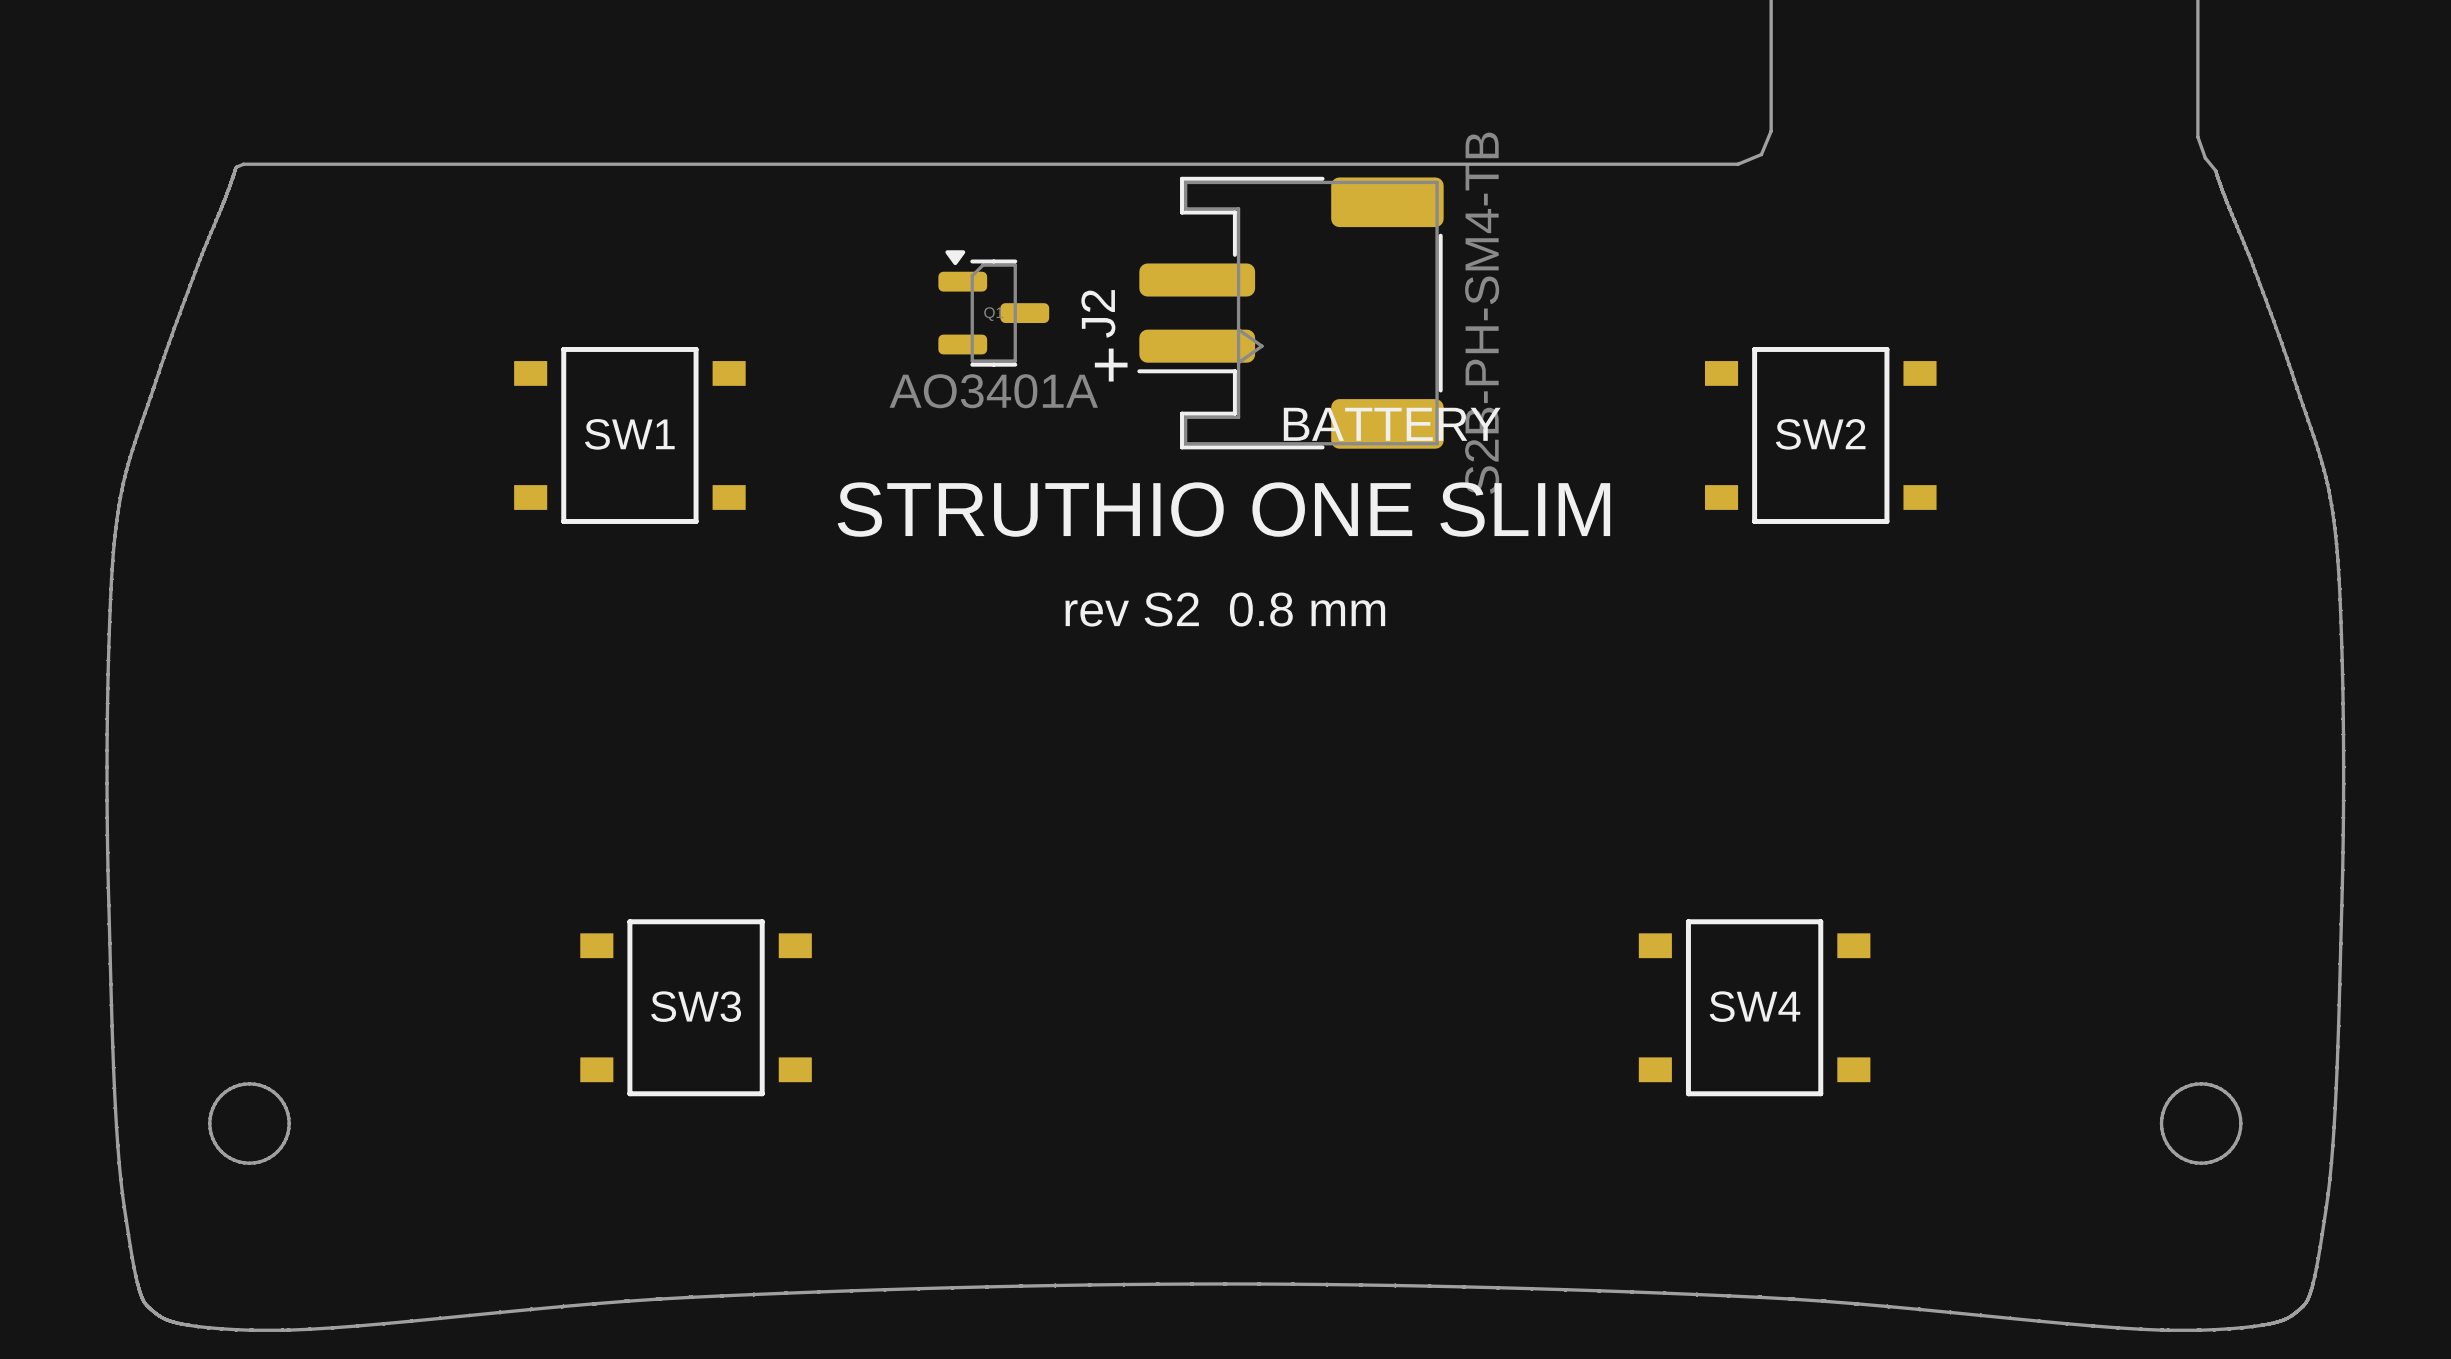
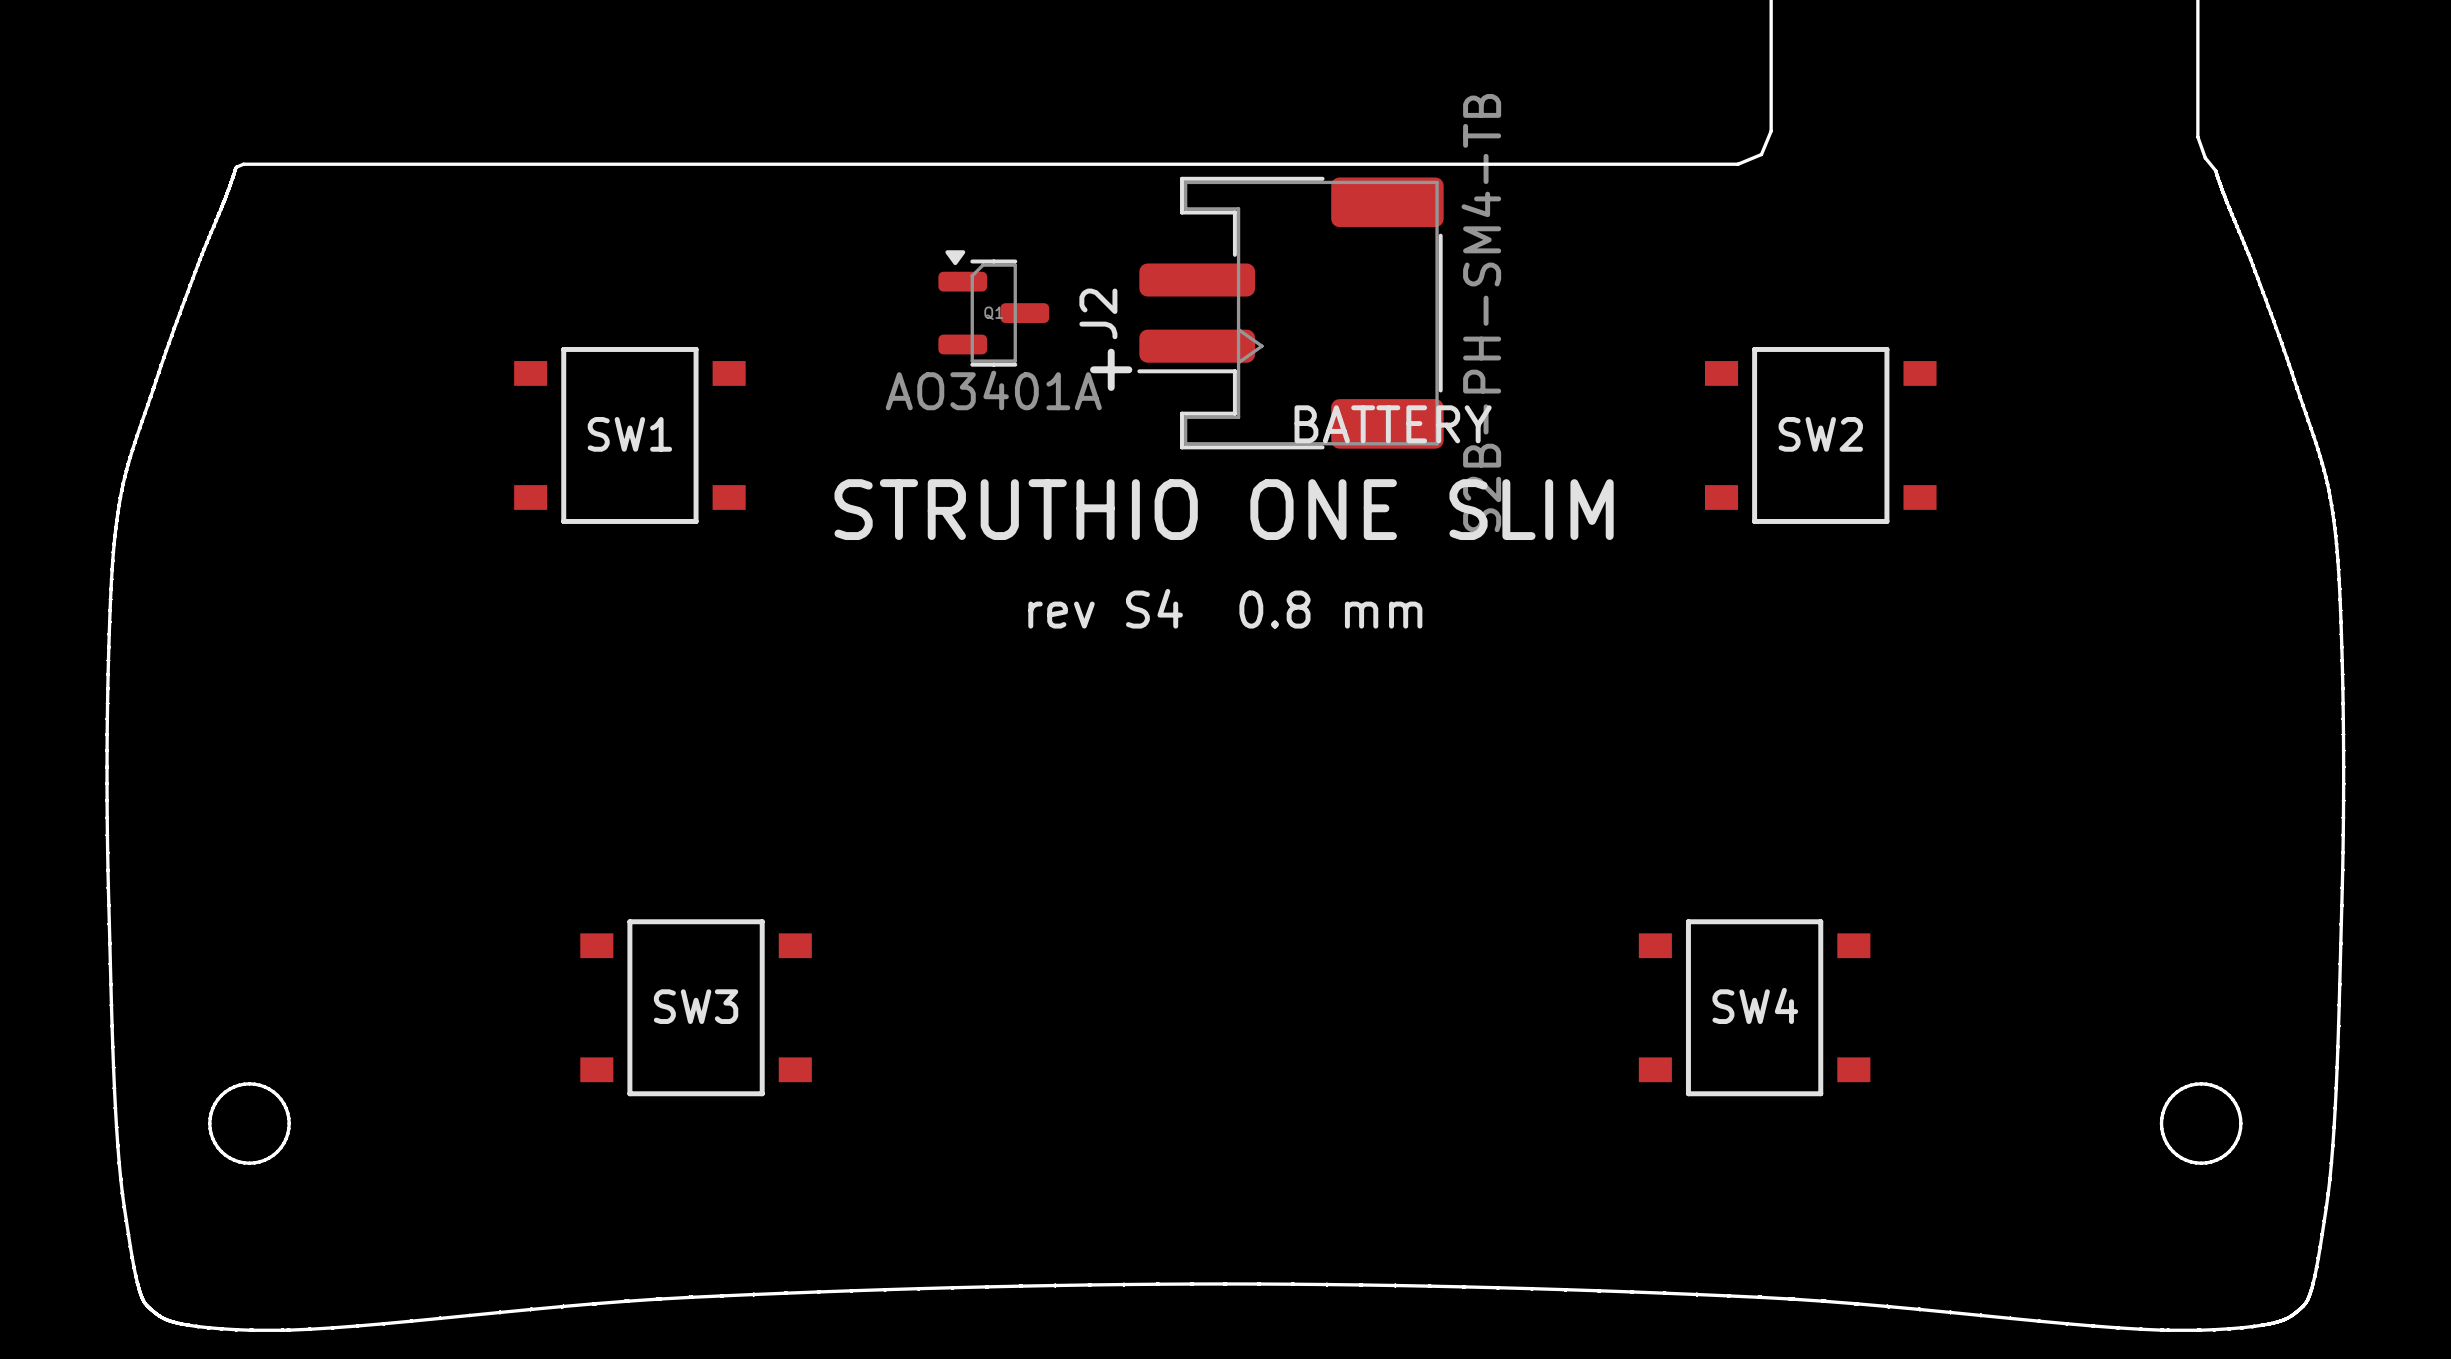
text: rev S2 0.8 mm (1225, 609) -> rev S4 0.8 mm (1225, 608)

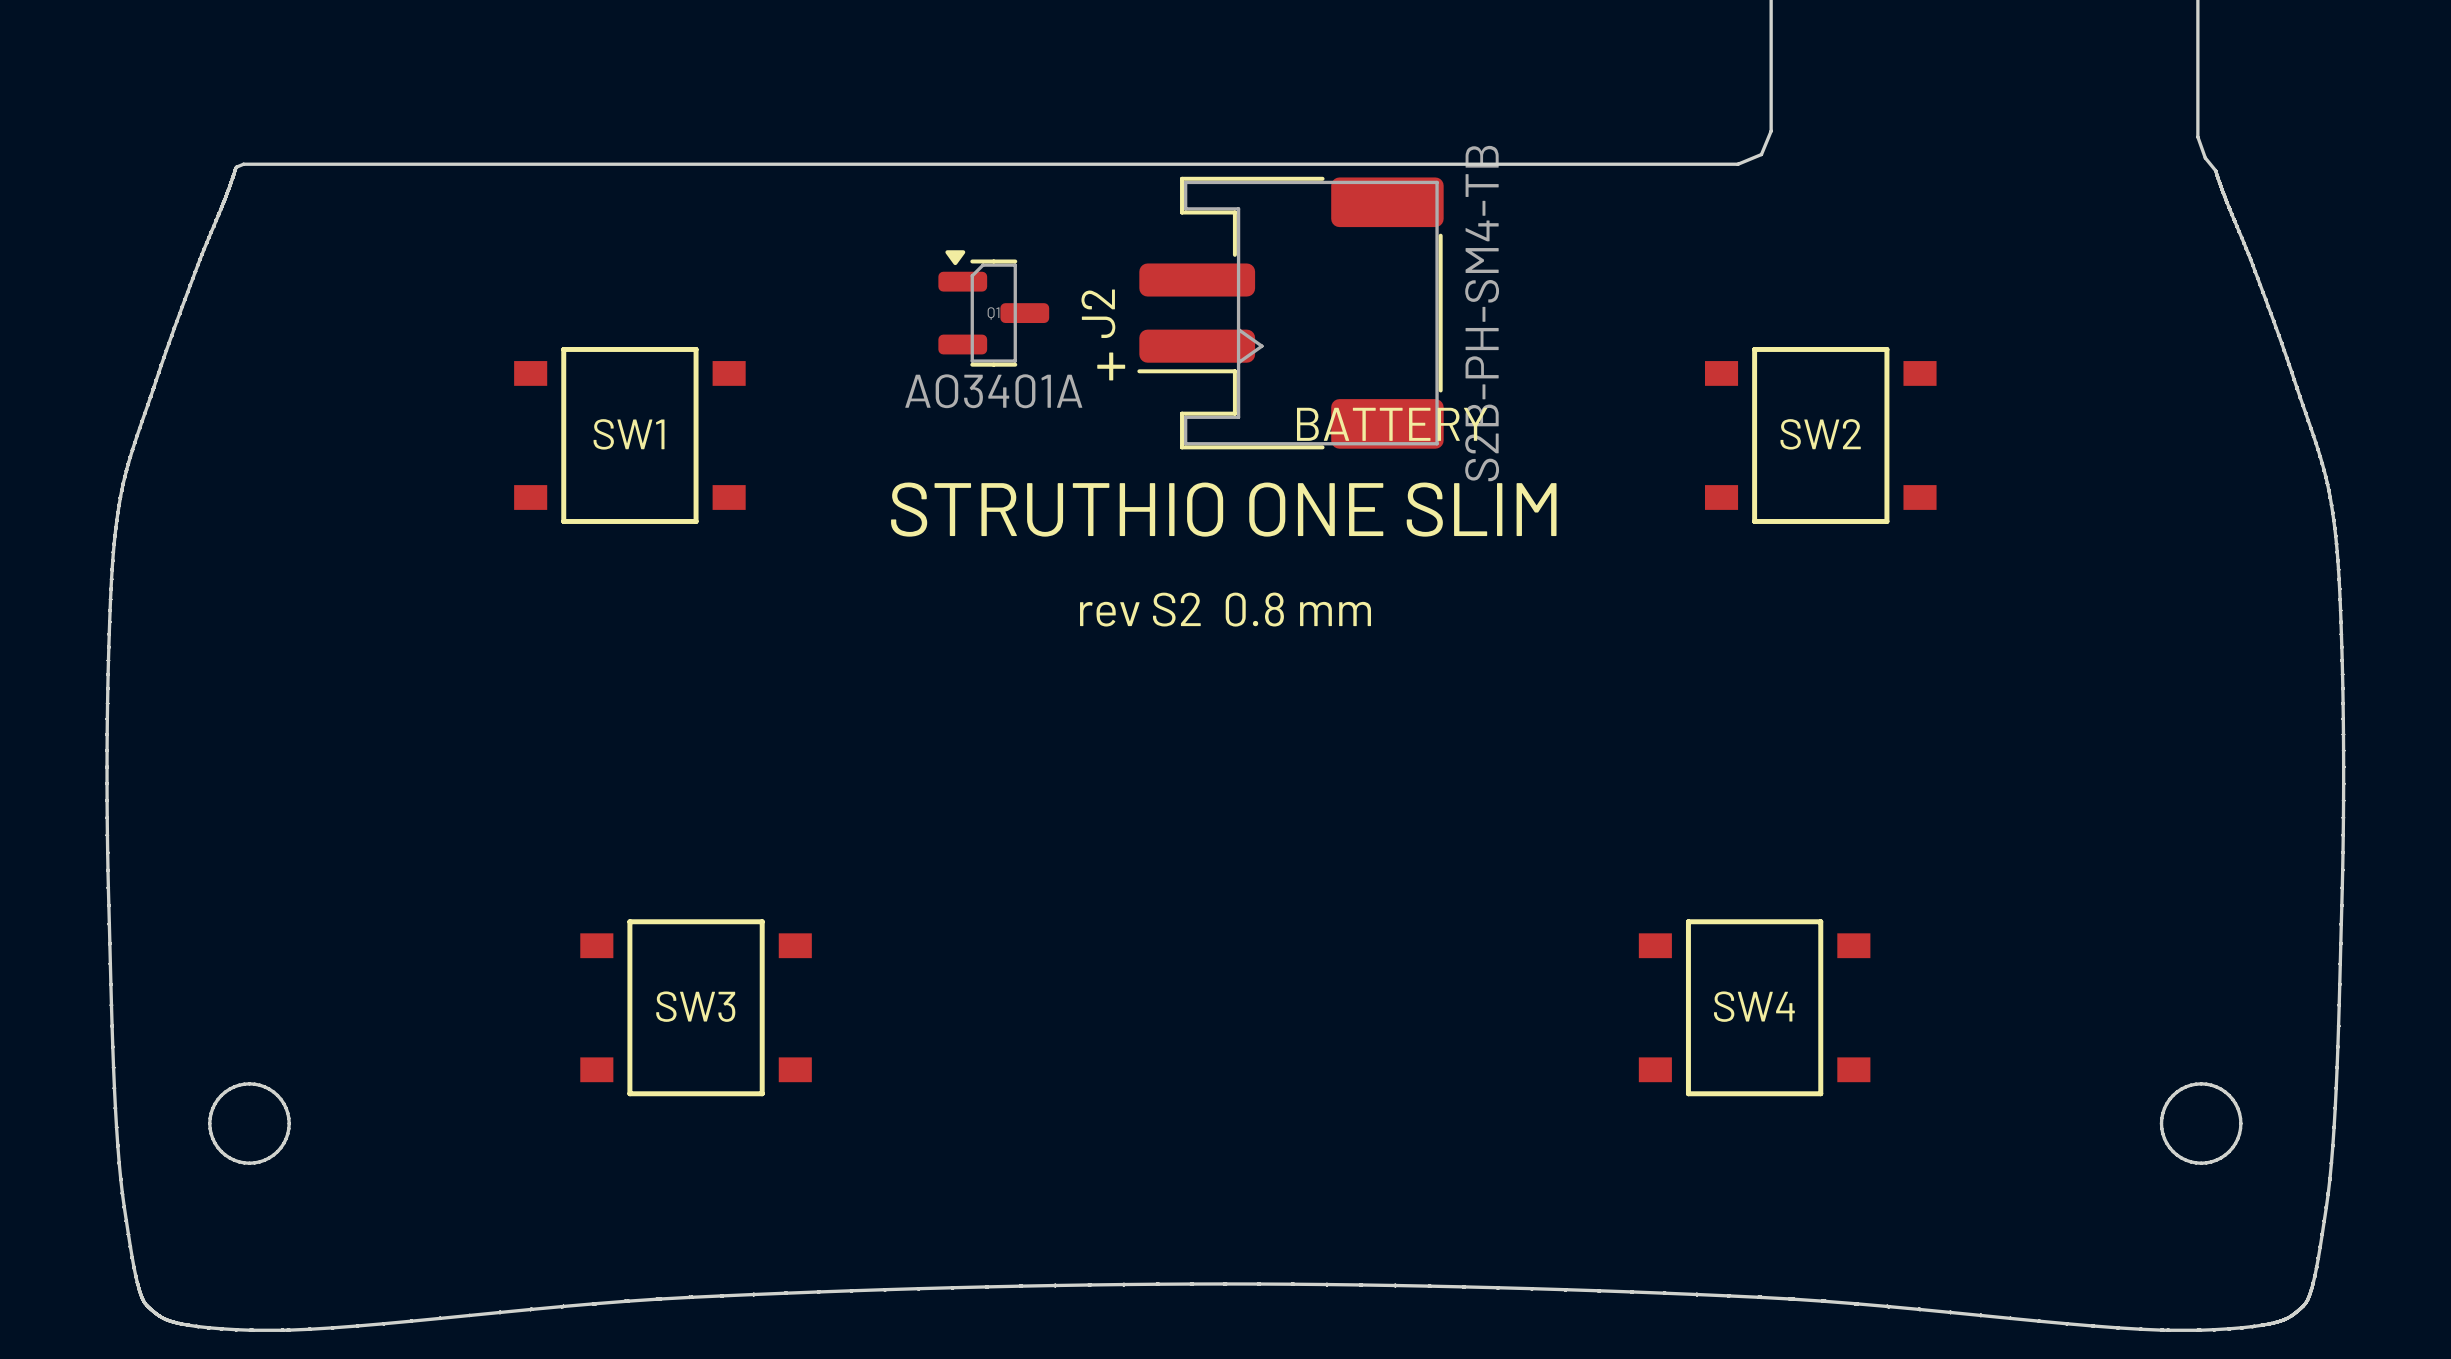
text: rev S4 0.8 mm (1225, 608) -> rev S2 0.8 mm (1225, 609)

